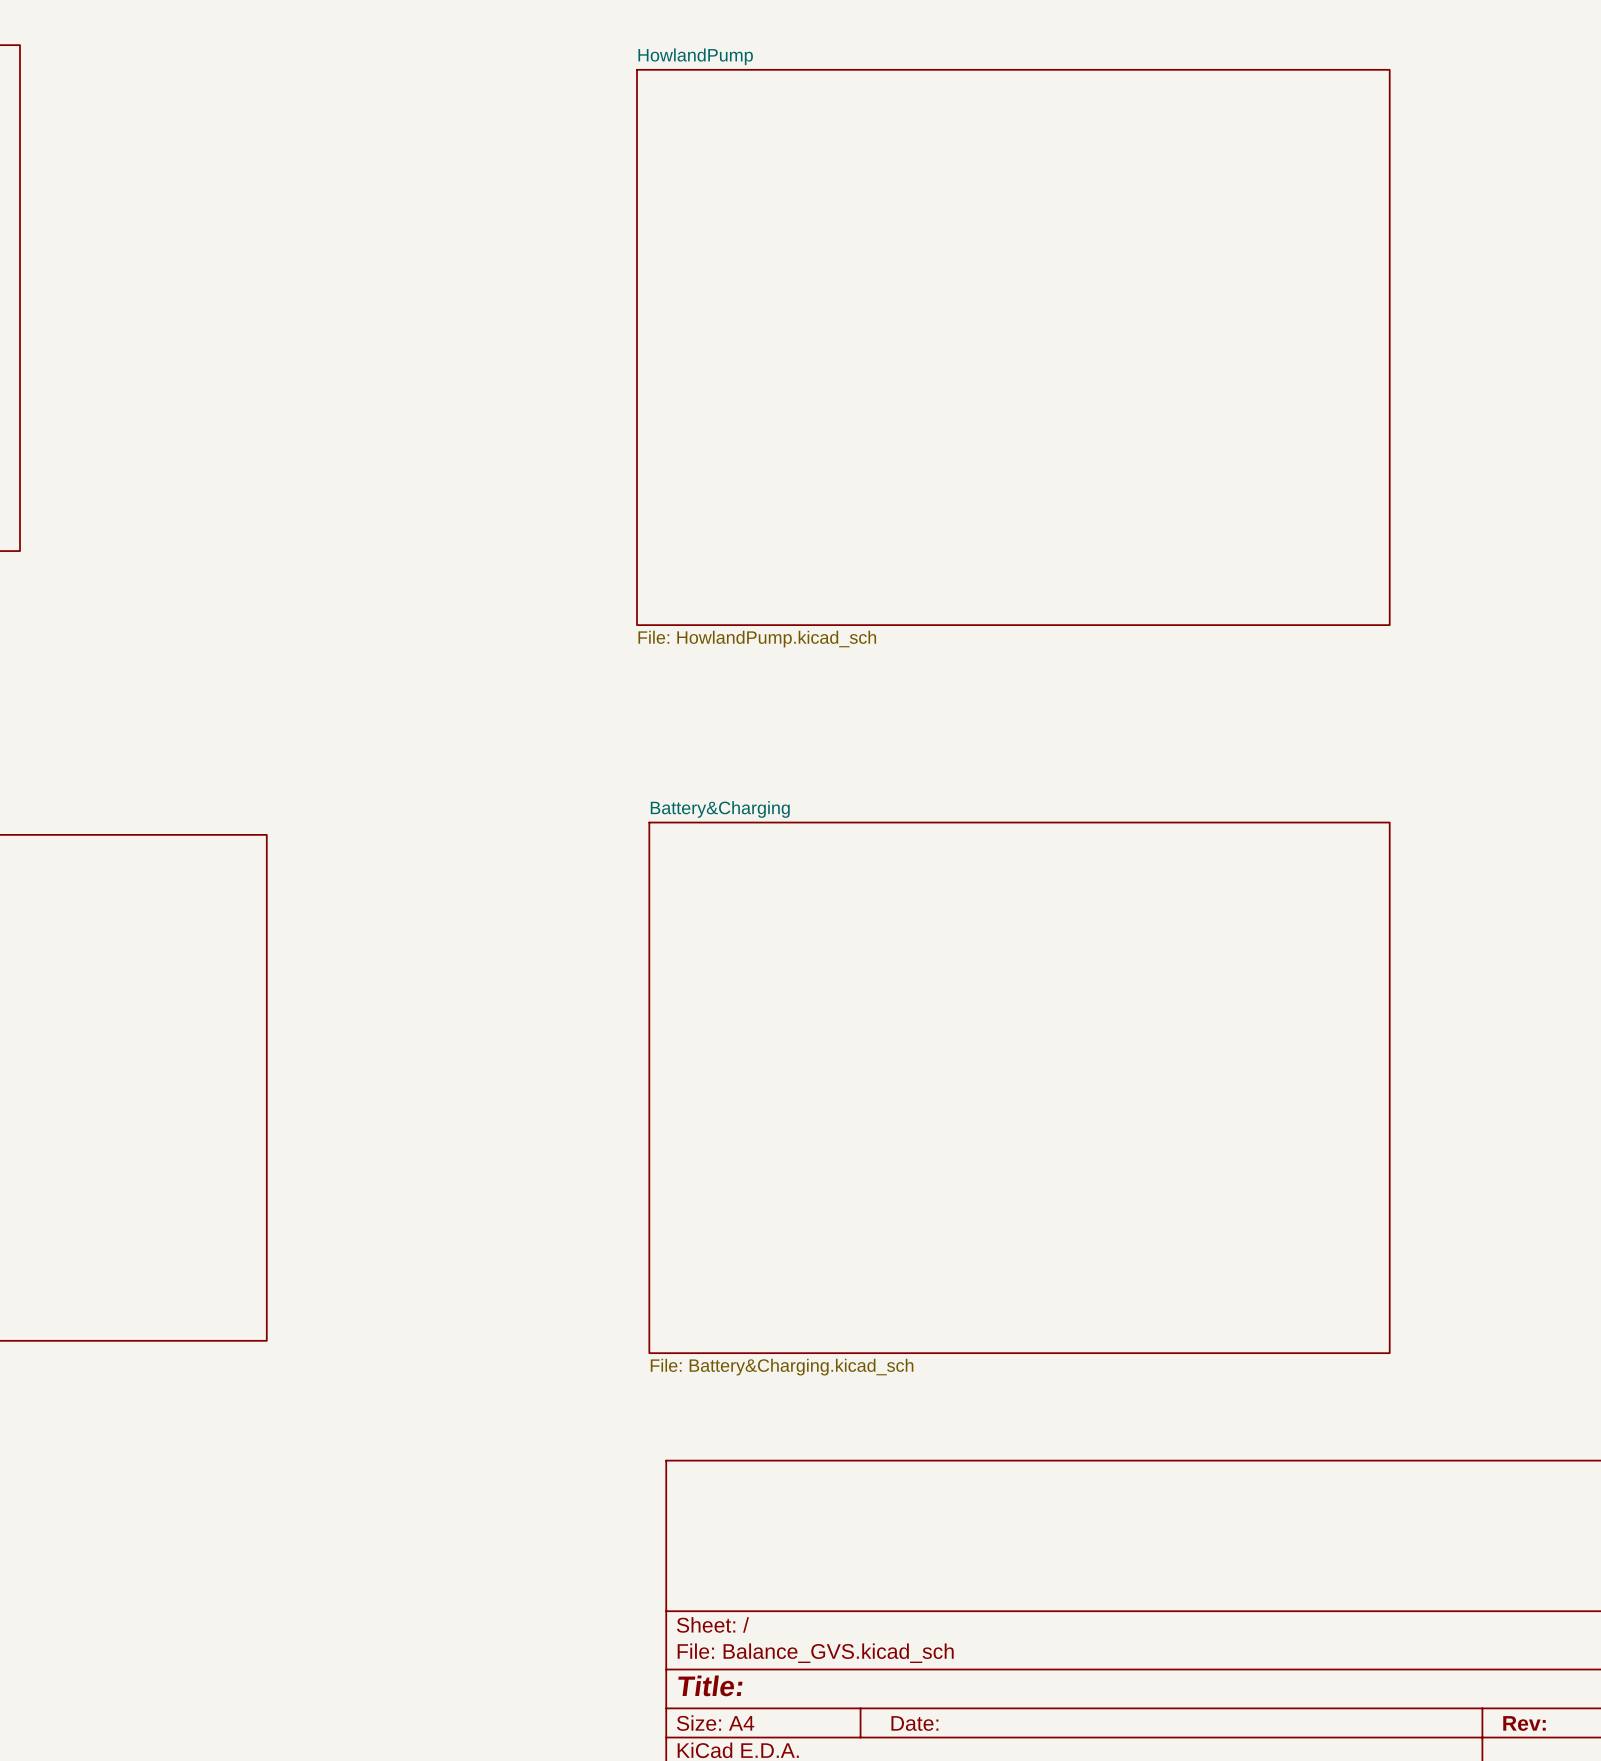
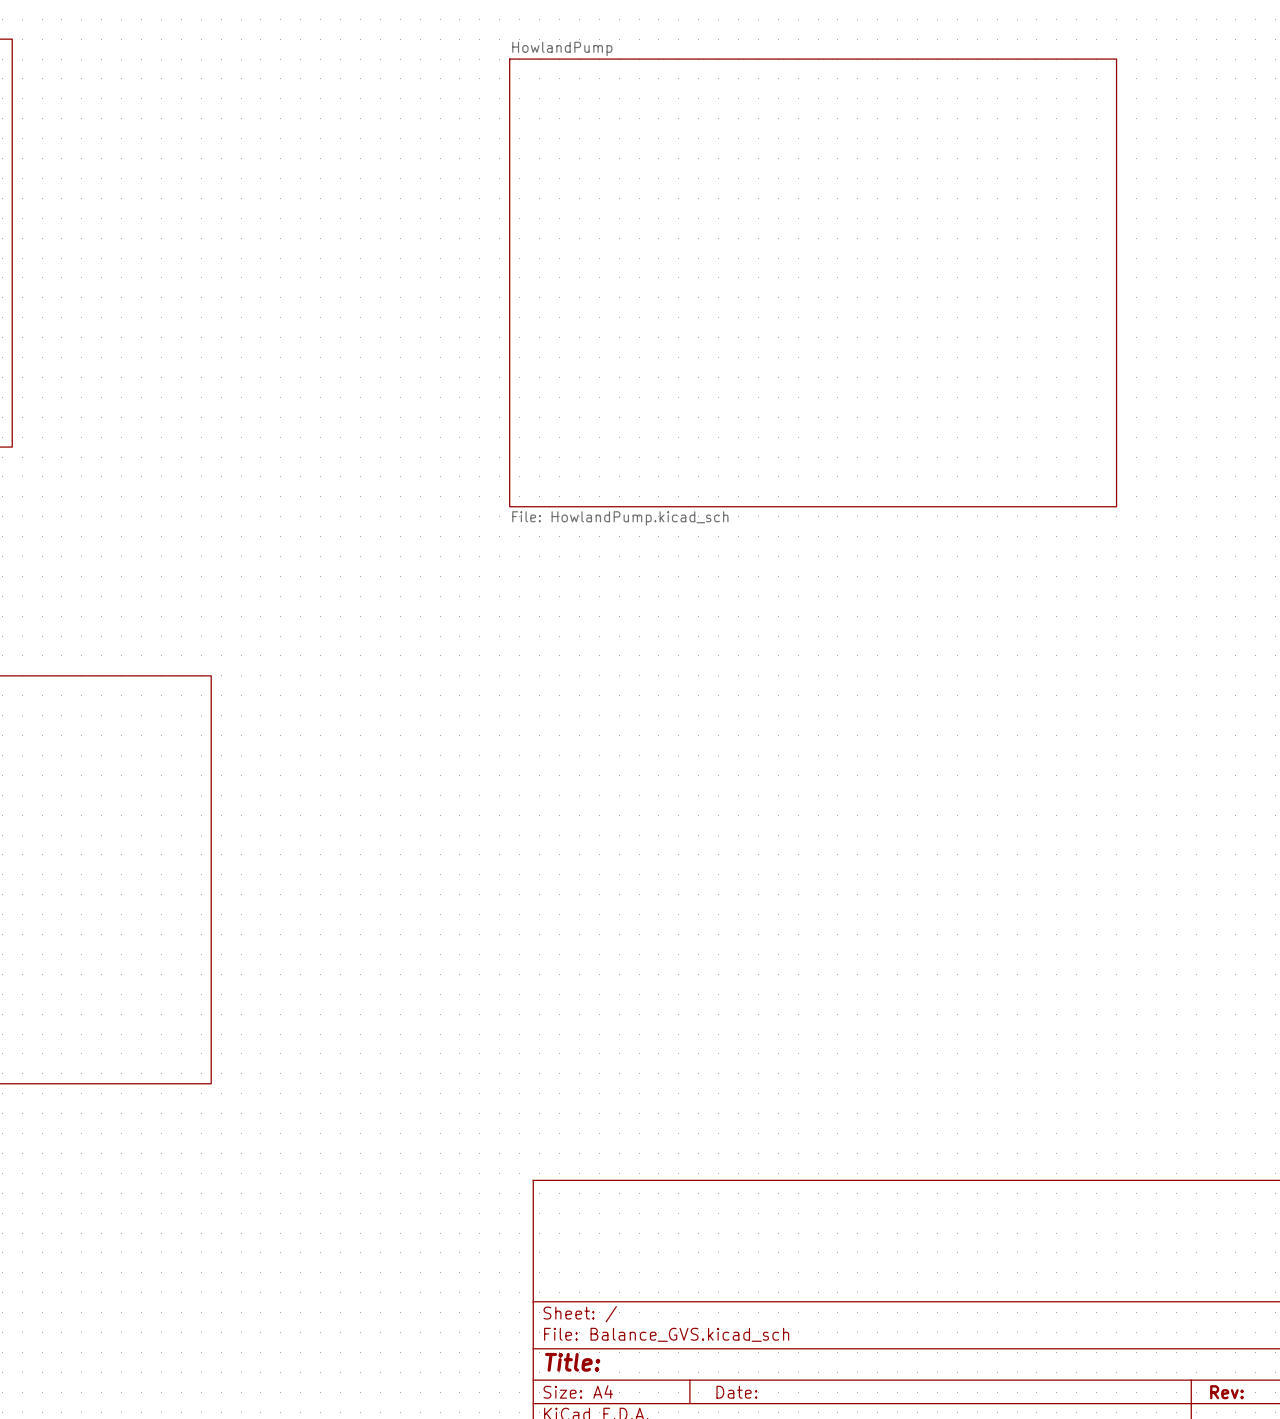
sheet Battery&Charging: File: Battery&Charging.kicad_sch (1019, 1087) -> none

